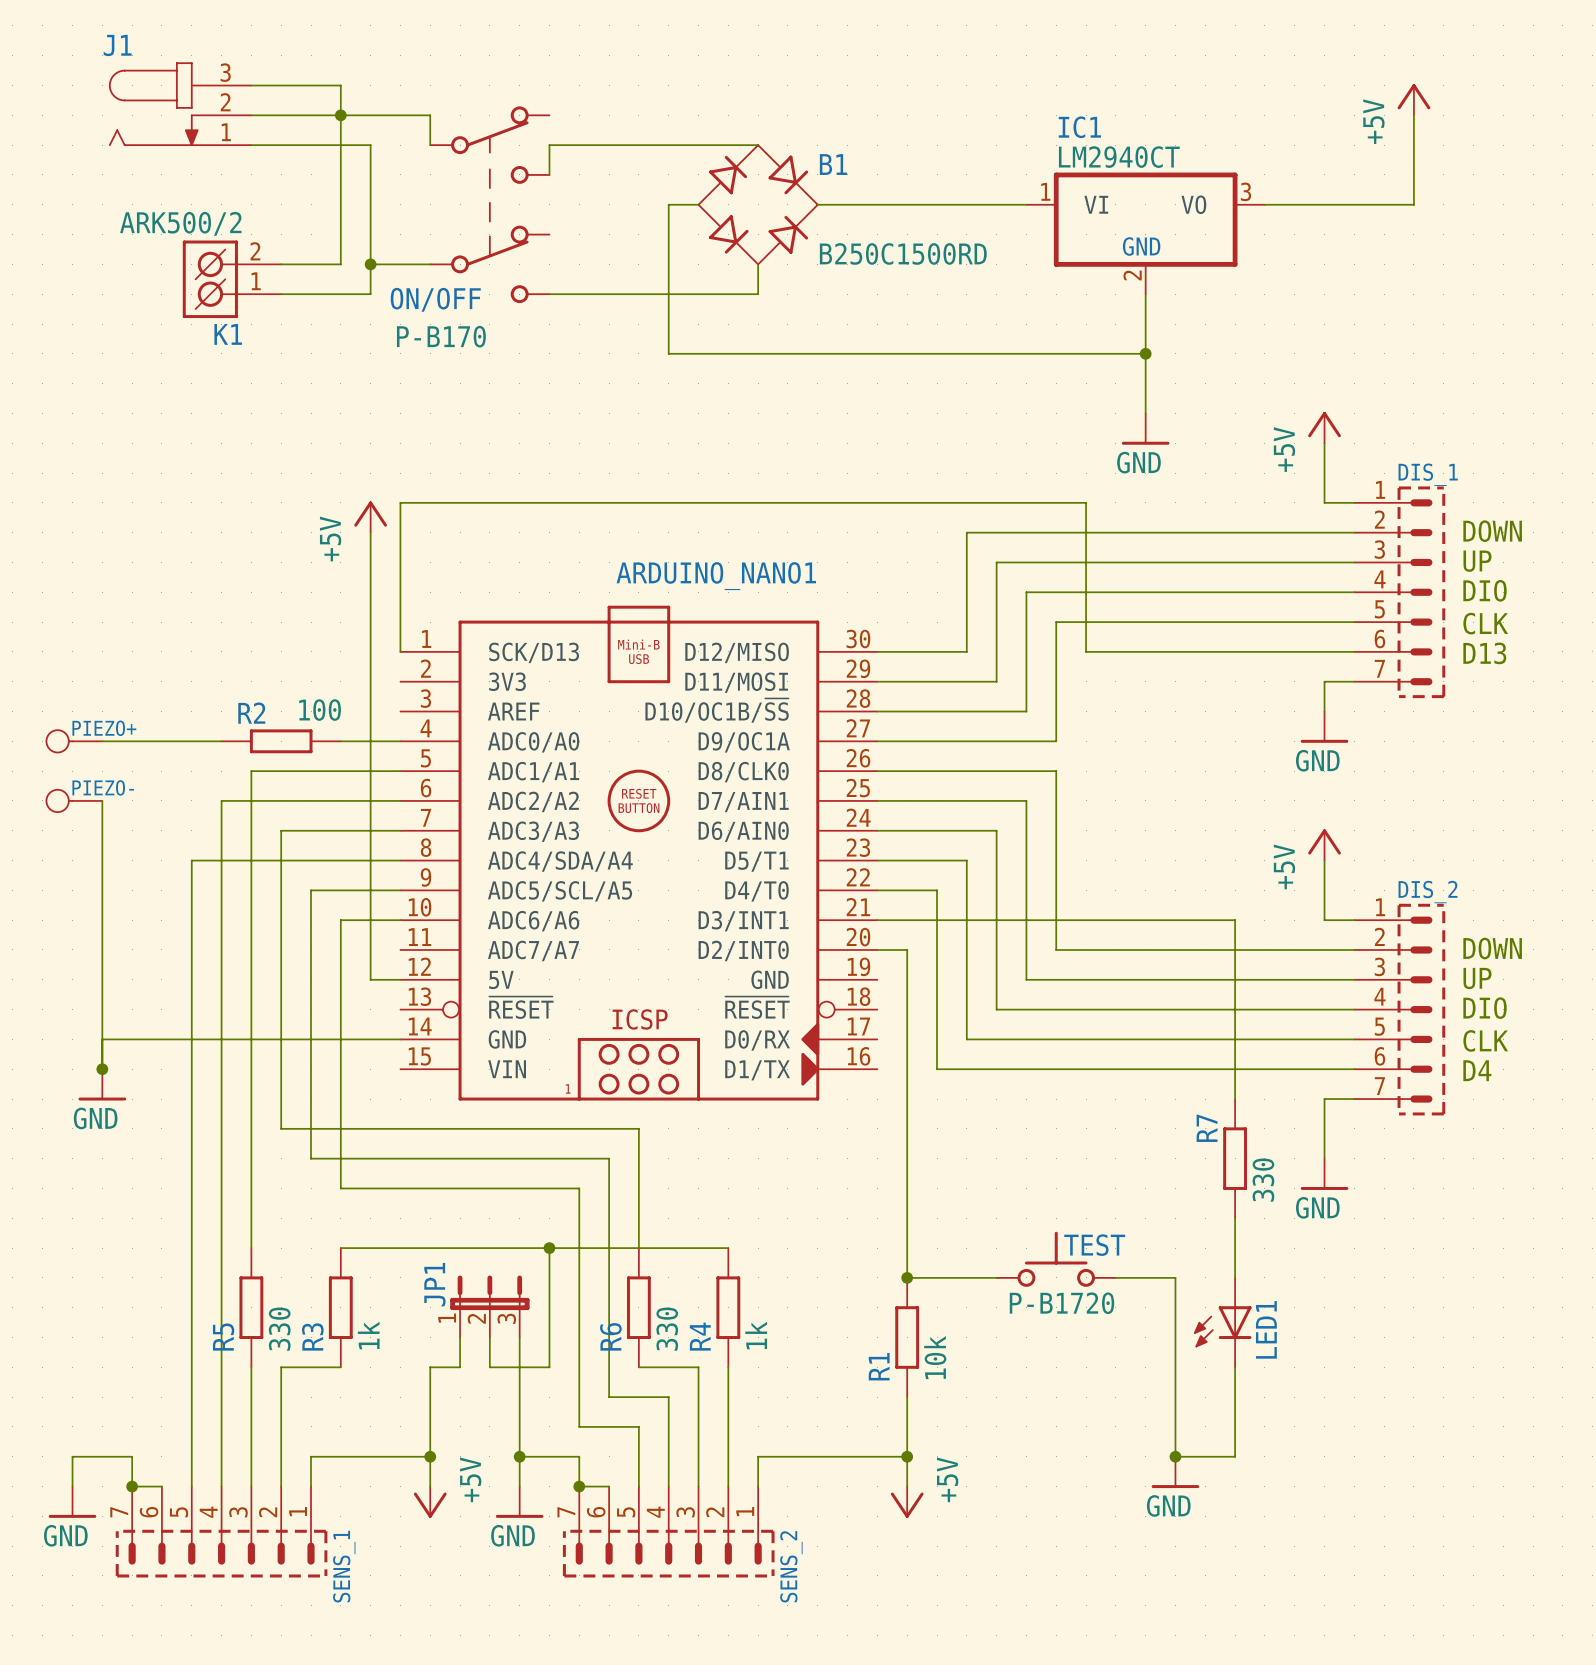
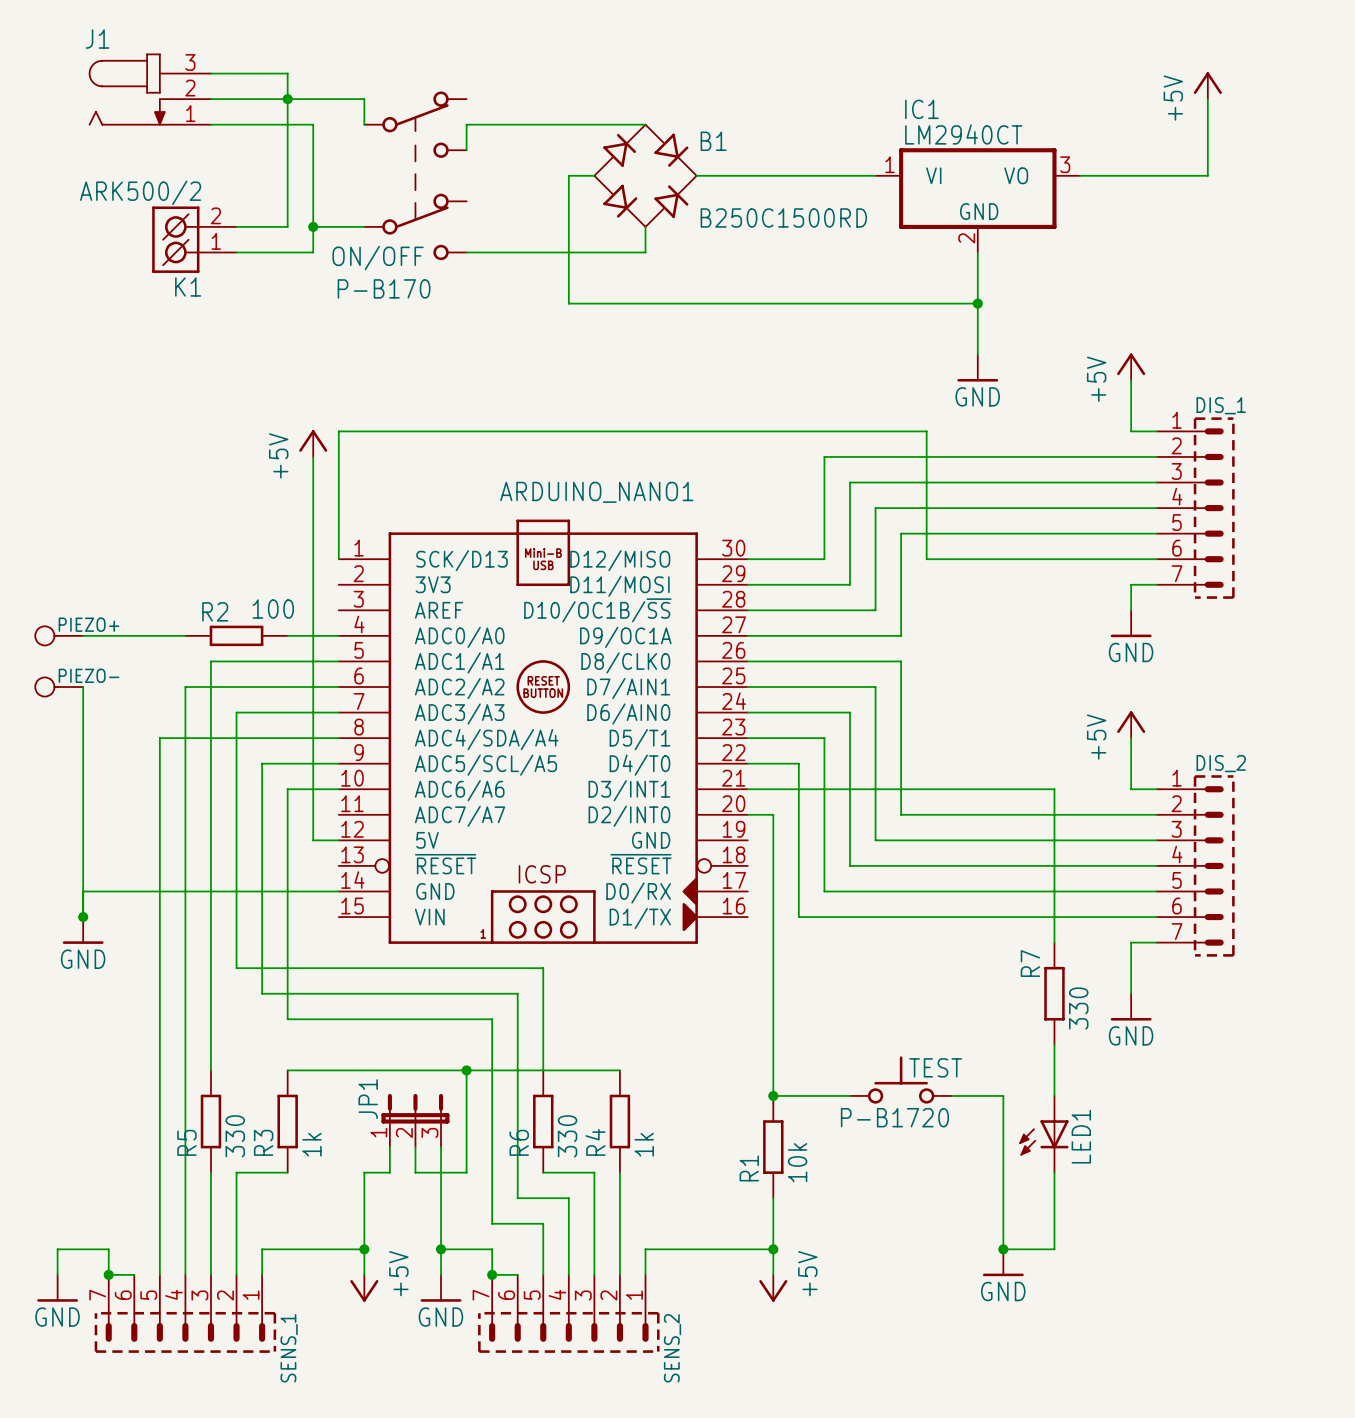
text: DOWN (1492, 531) -> none
text: UP (1477, 561) -> none
text: DIO (1485, 590) -> none
text: CLK (1485, 623) -> none
text: D13 (1484, 653) -> none
text: DOWN (1492, 948) -> none
text: UP (1477, 978) -> none
text: DIO (1485, 1008) -> none
text: CLK (1485, 1040) -> none
text: D4 (1477, 1070) -> none

